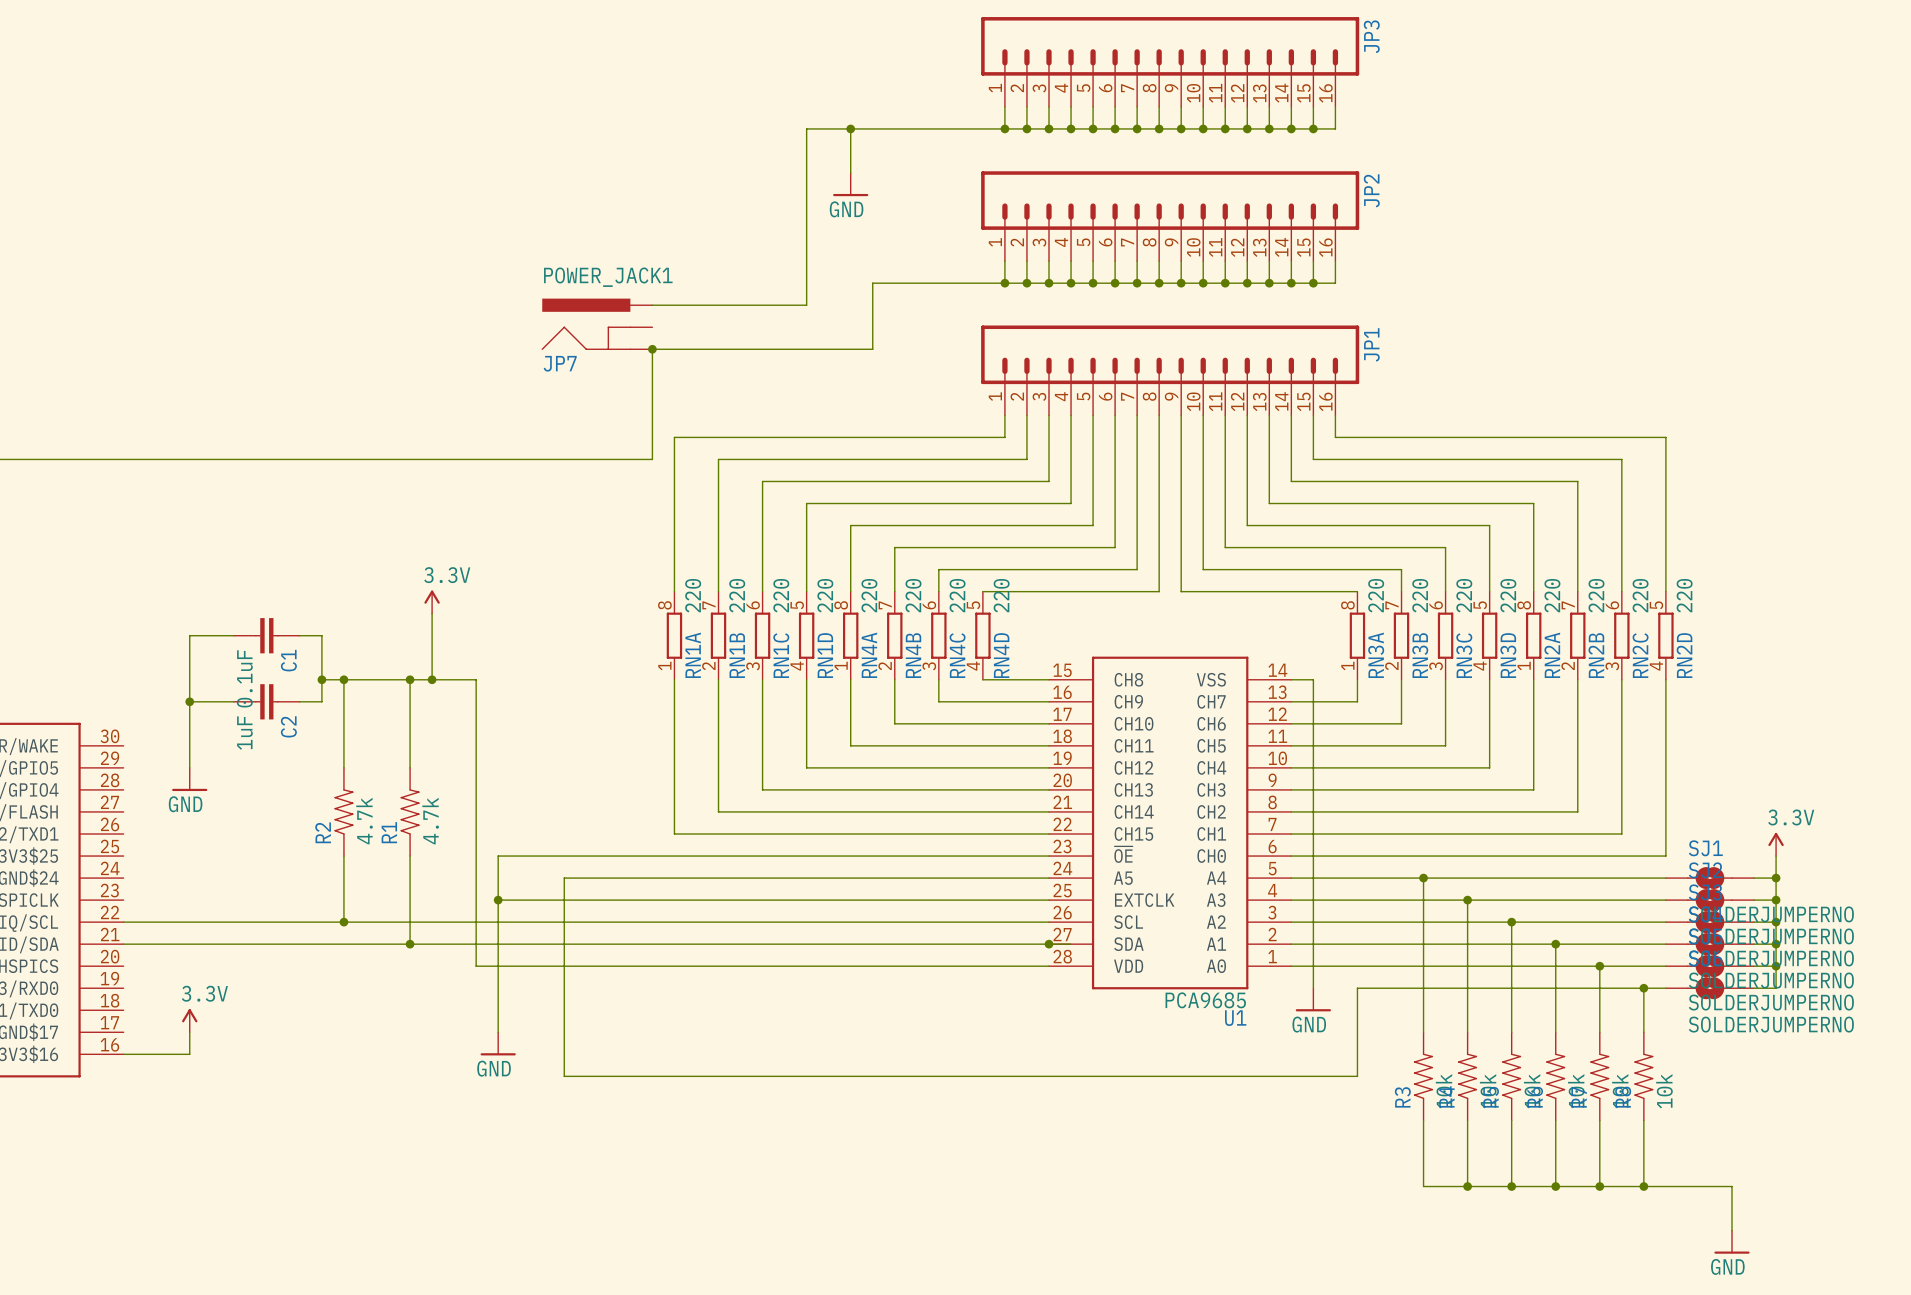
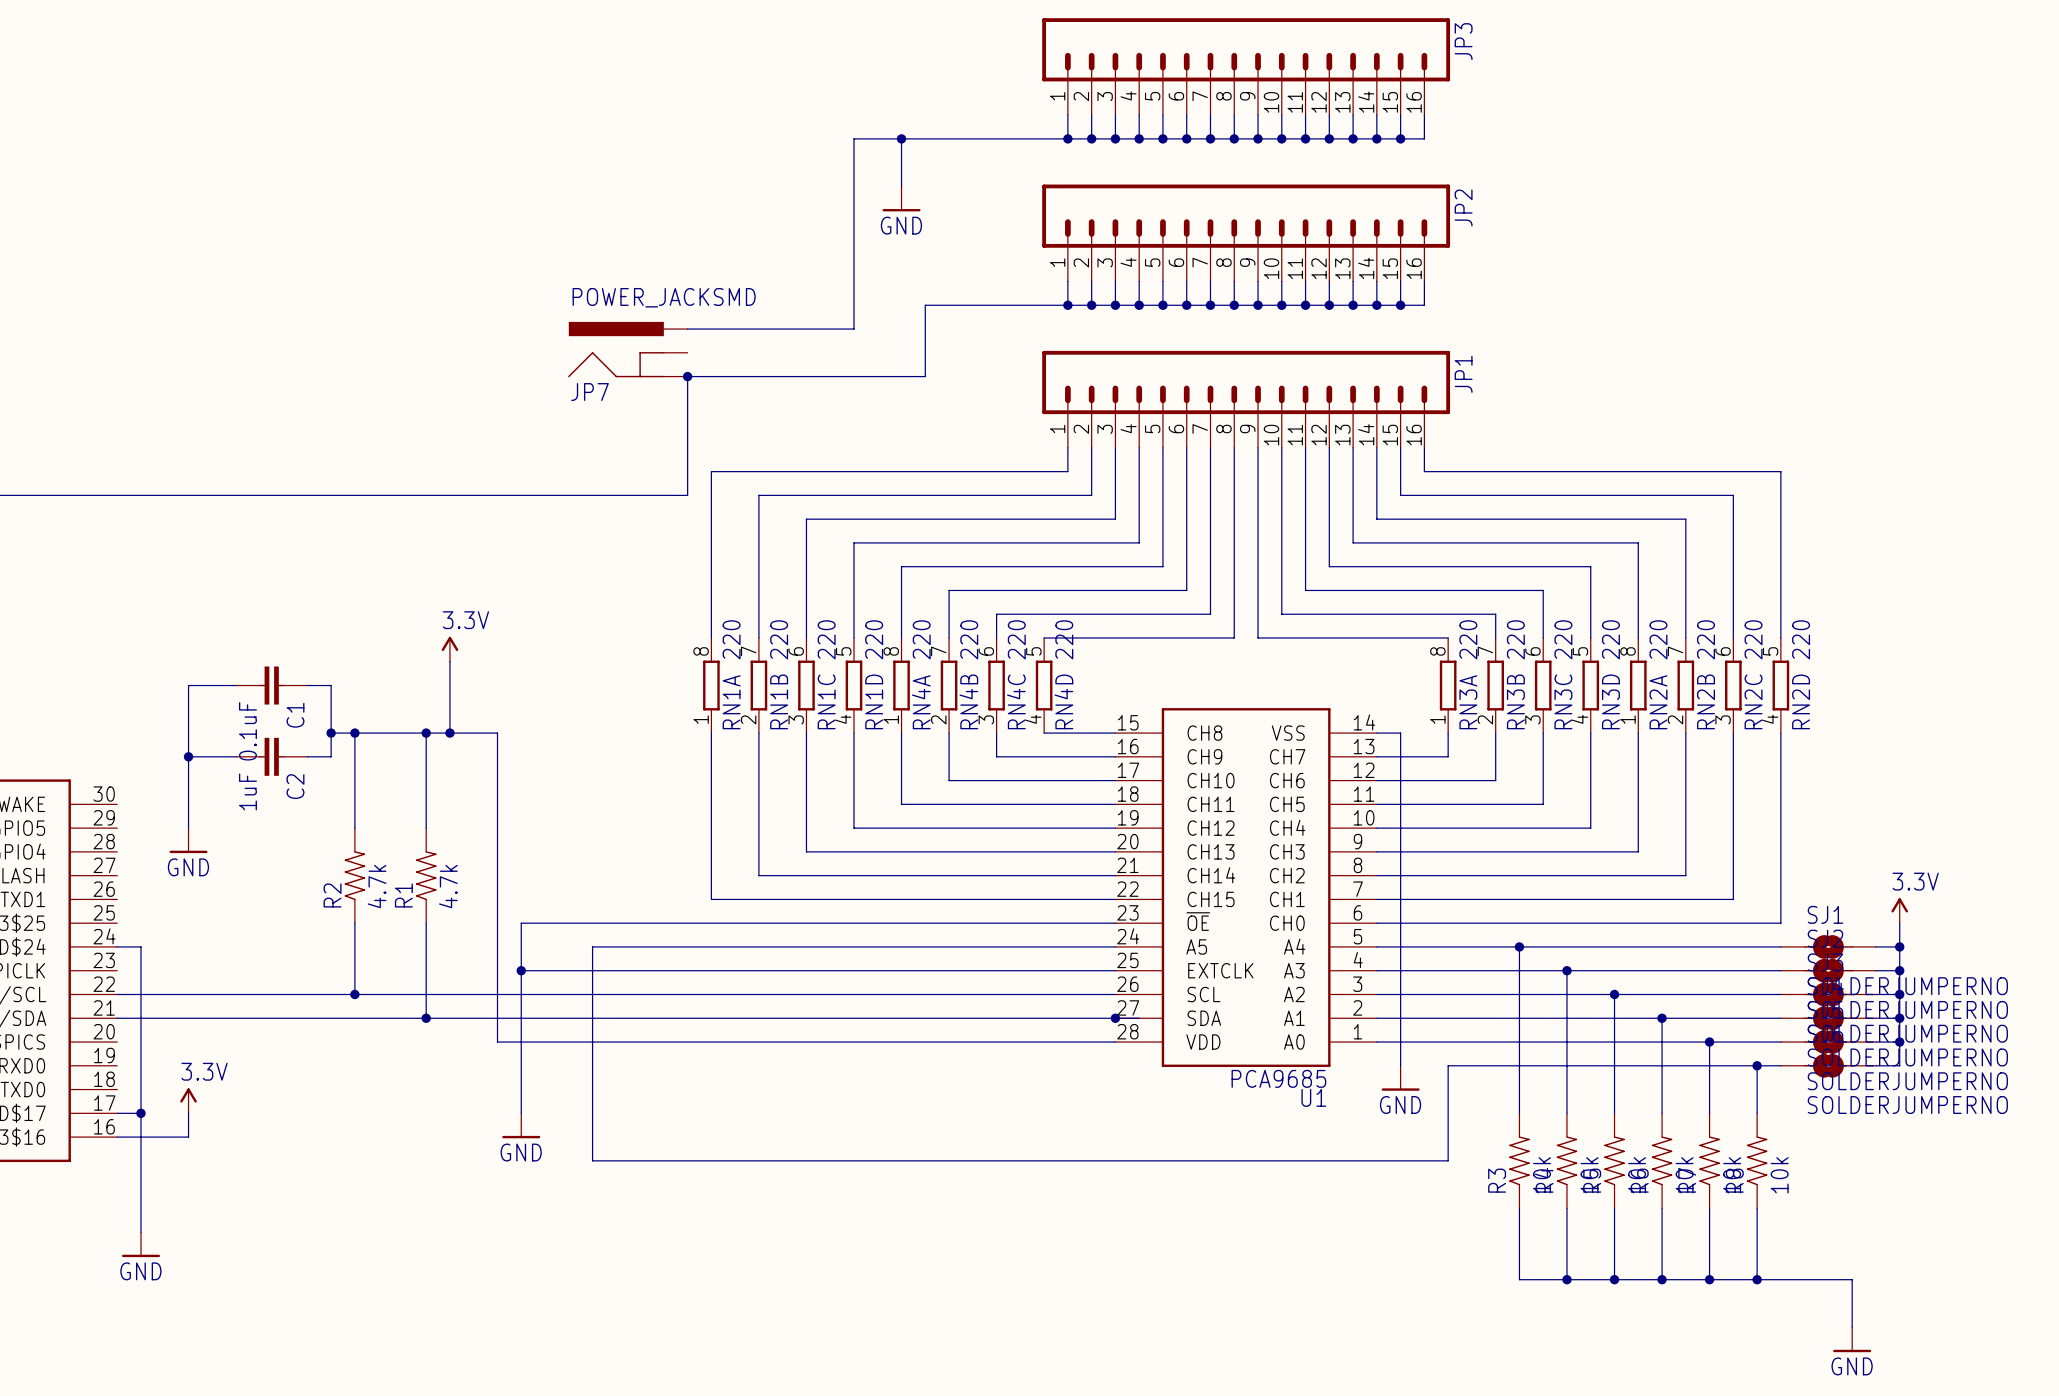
JP7 value: POWER_JACK1 (608, 277) -> POWER_JACKSMD (664, 297)
wire: none -> (117, 946) (141, 946) (141, 1232)
wire: none -> (117, 1113) (141, 1113)
junction: none -> (141, 1113)
power symbol: none -> GND (141, 1244)

